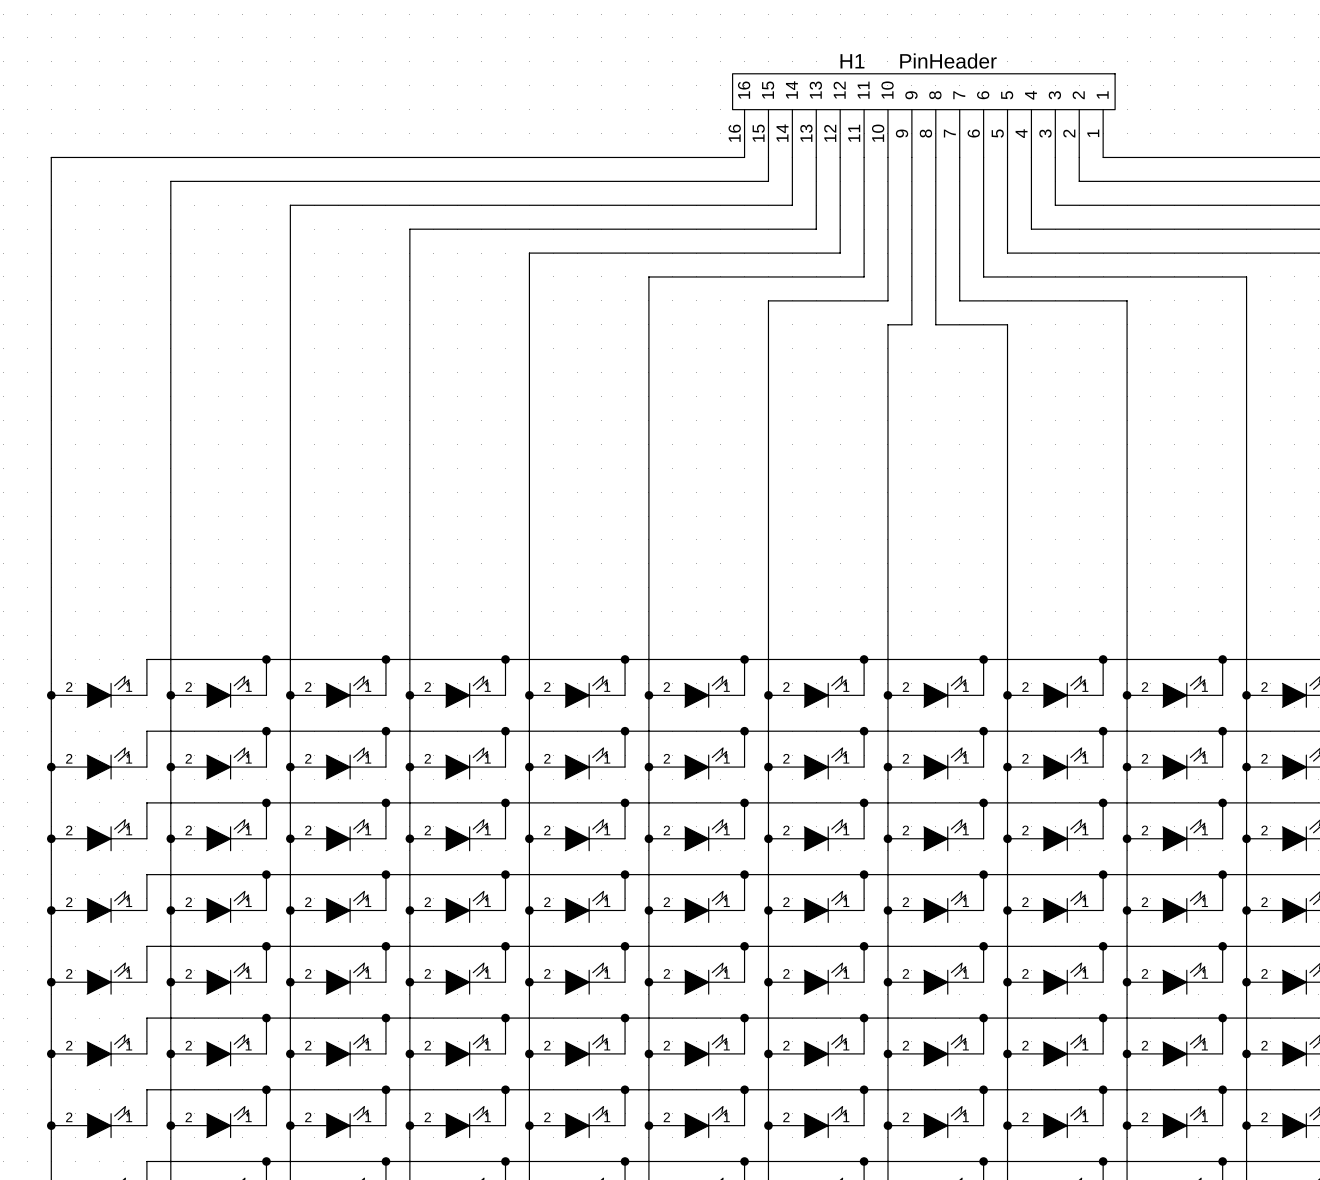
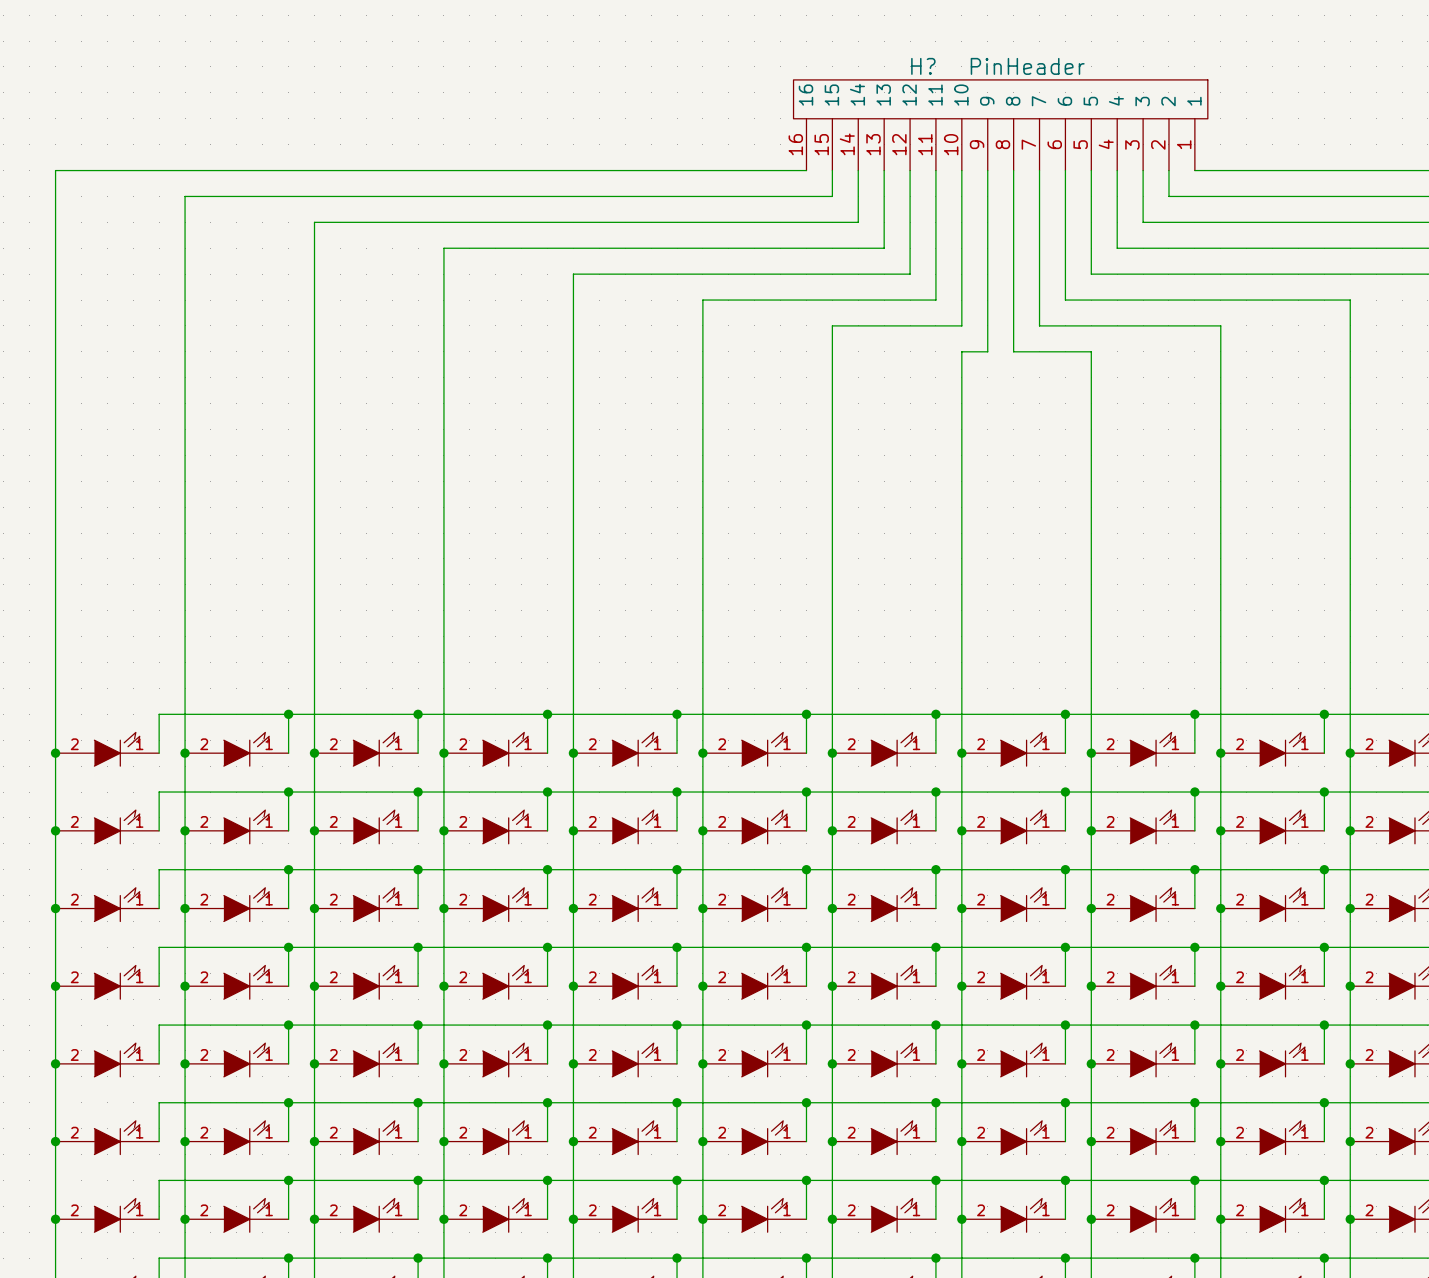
H1 name: H1 (852, 61) -> H? (923, 66)

